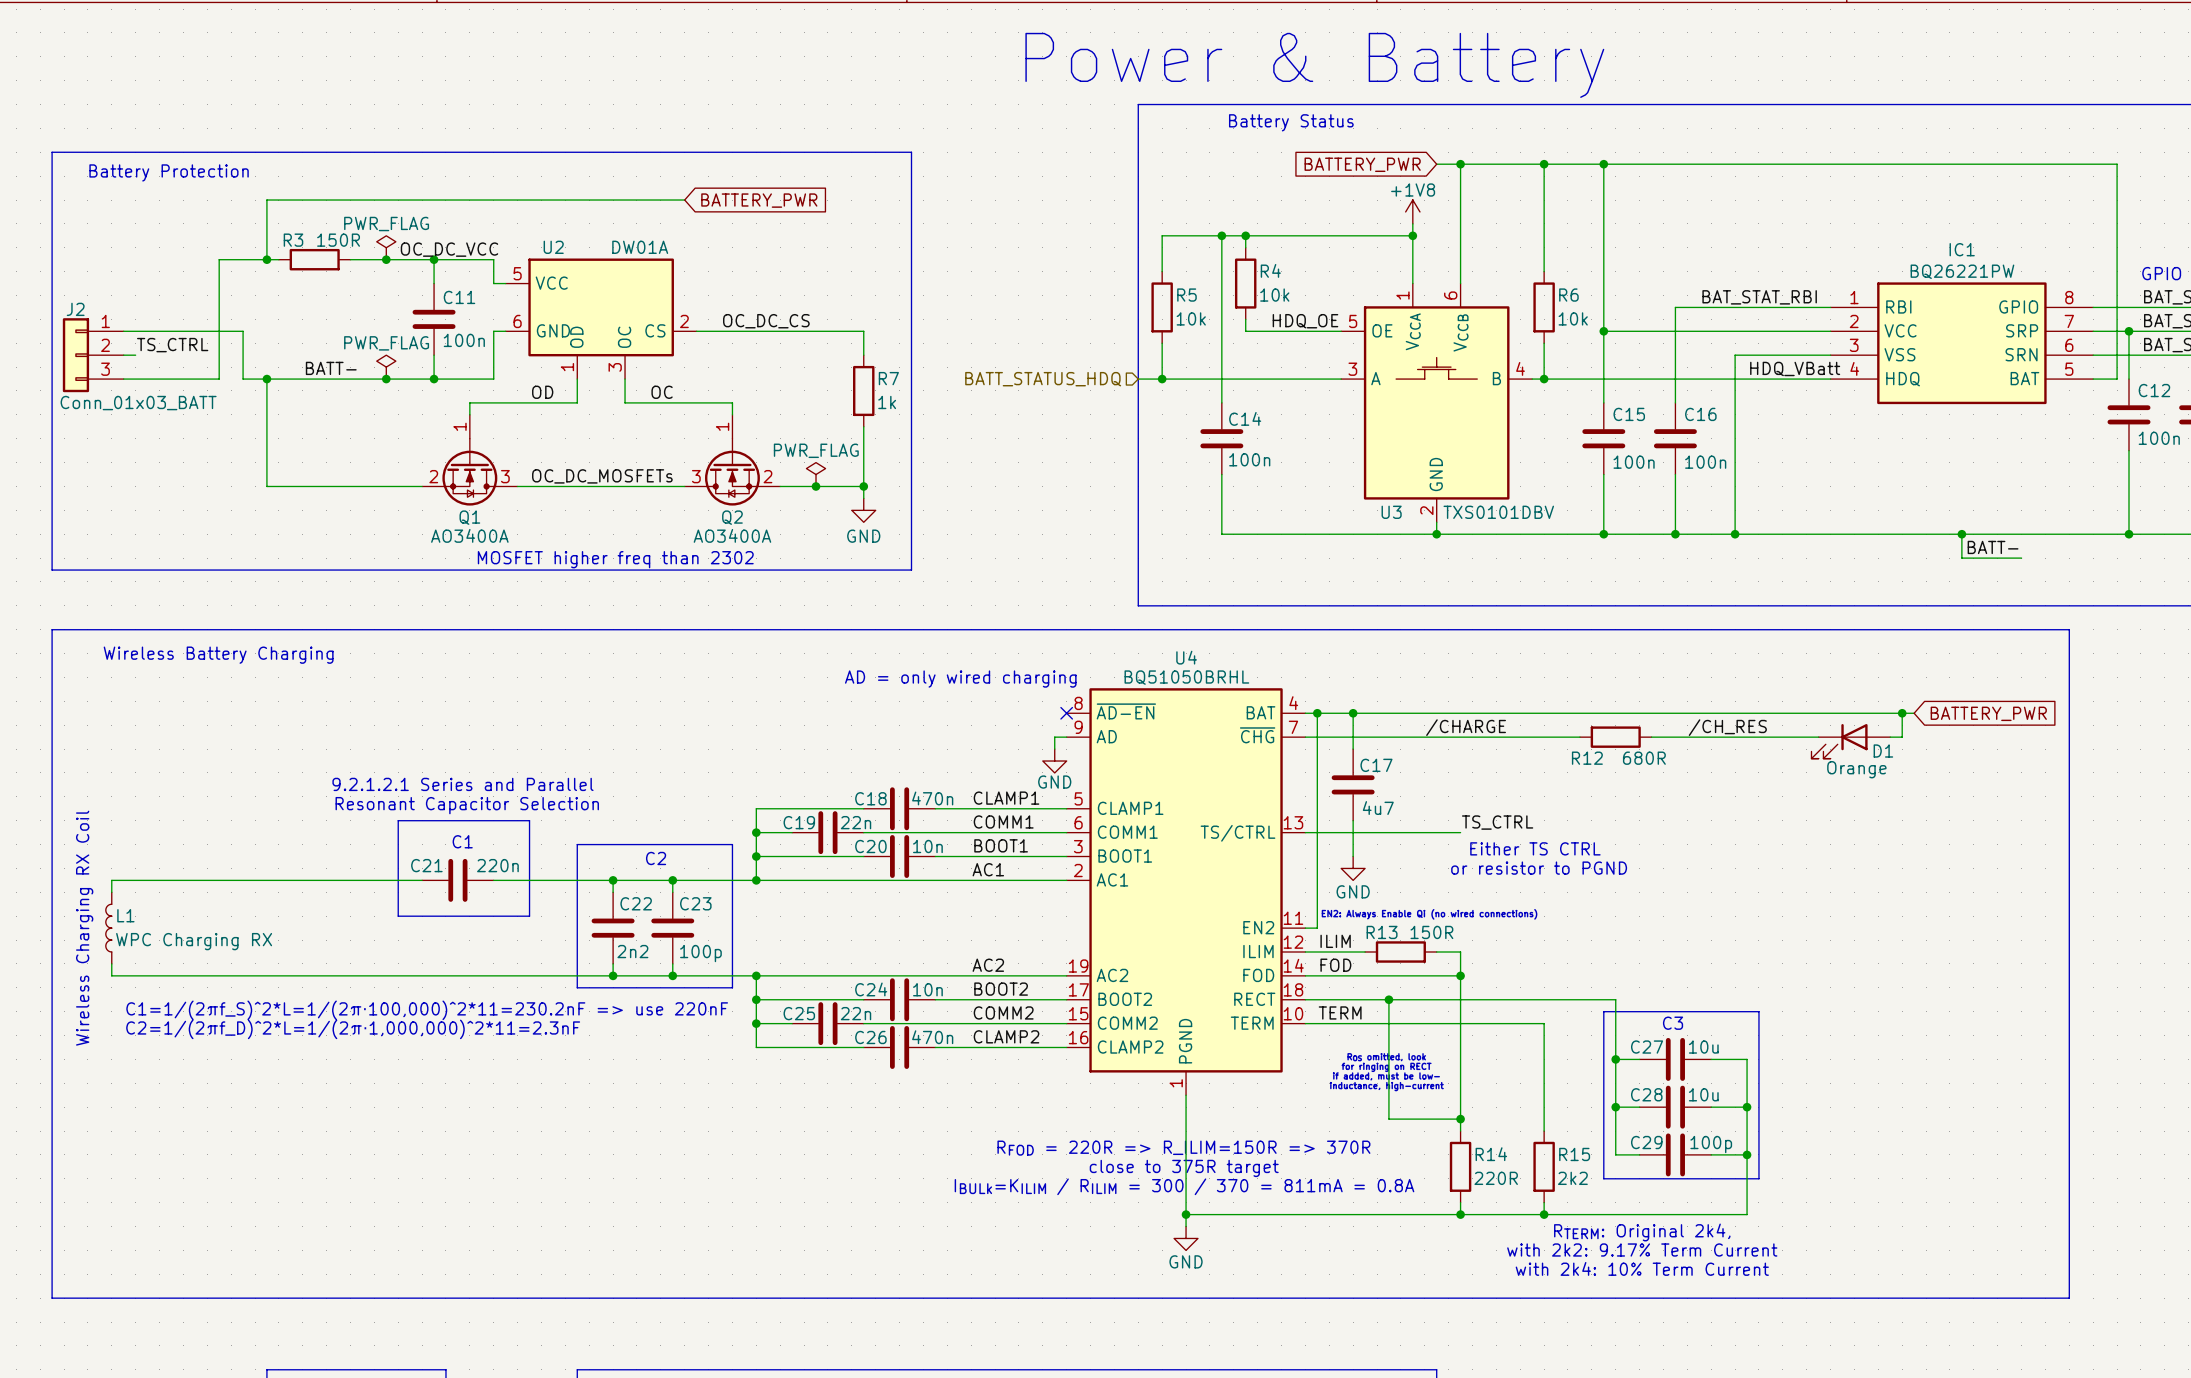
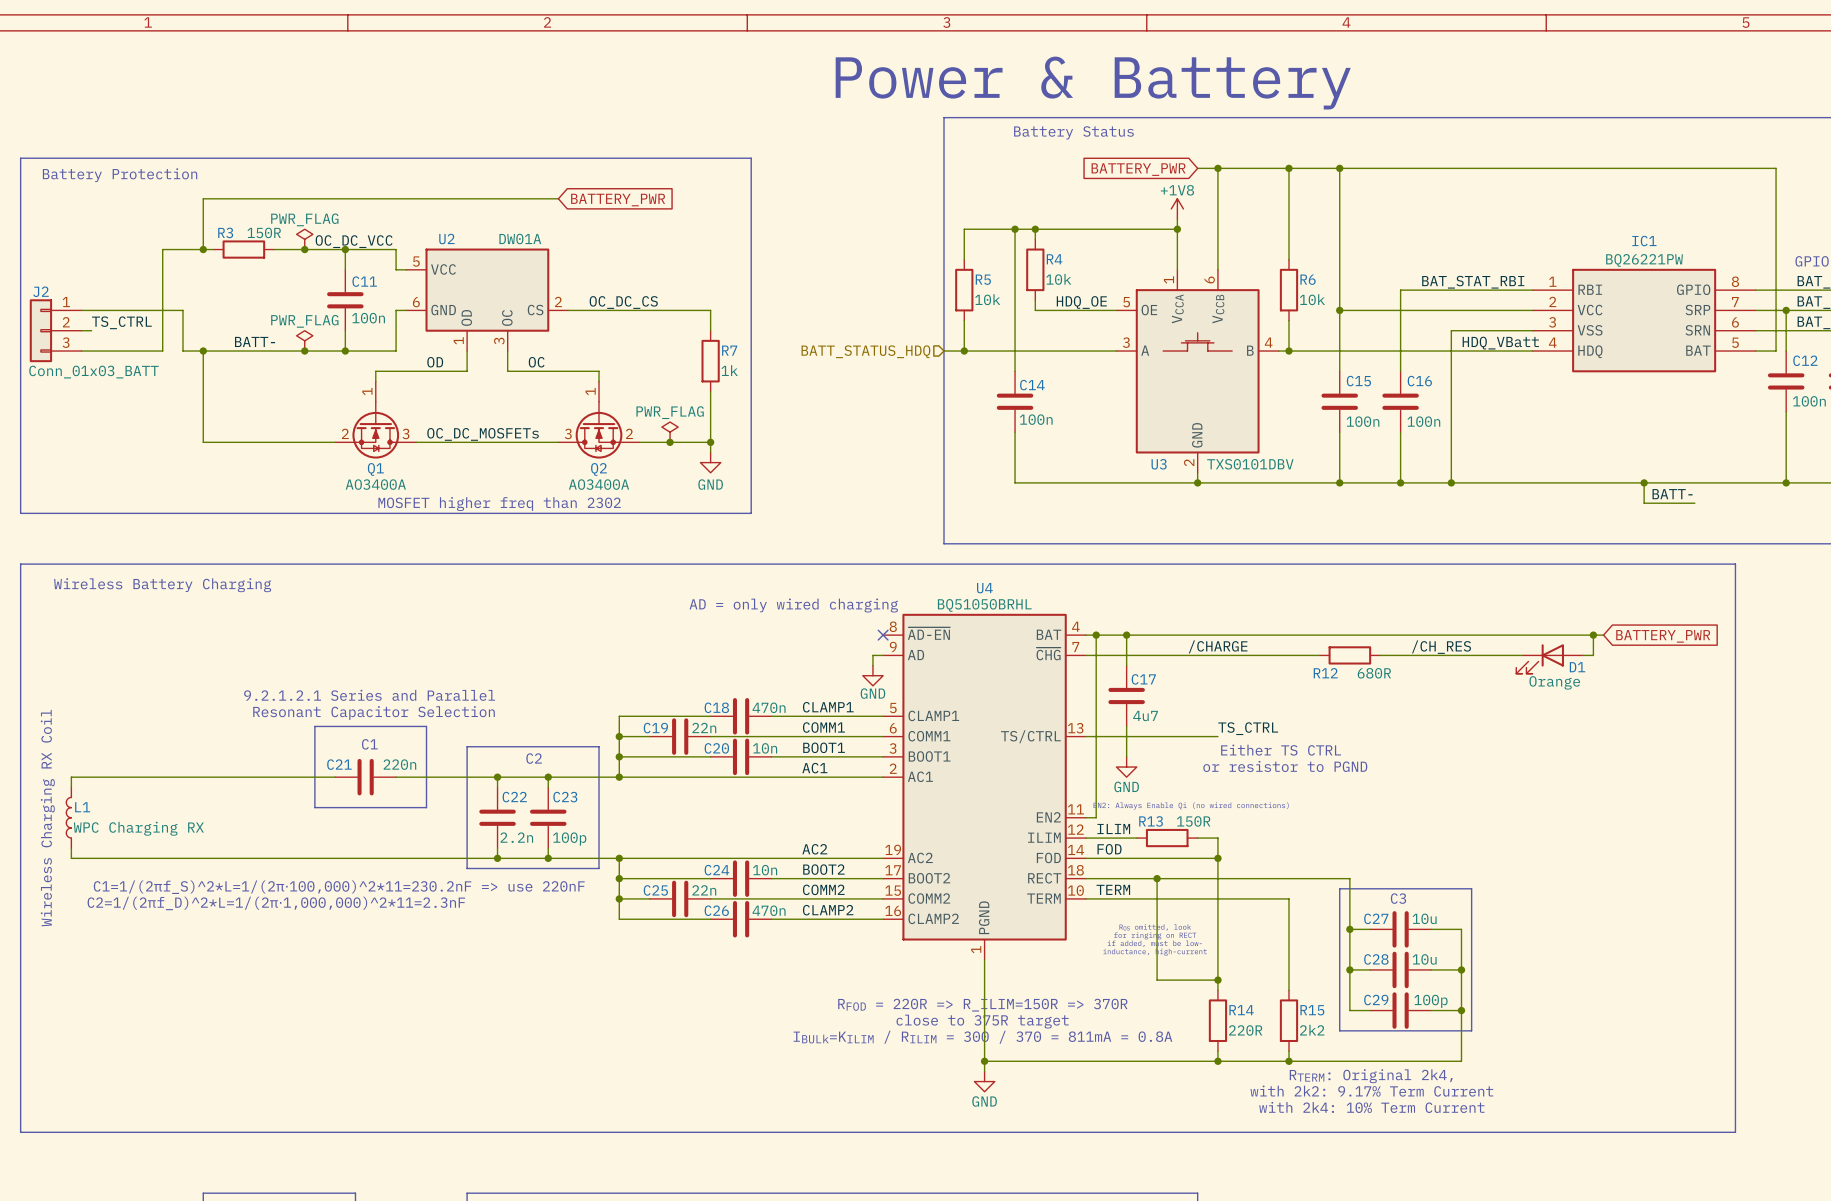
C22 value: 2n2 (632, 951) -> 2.2n (516, 837)

